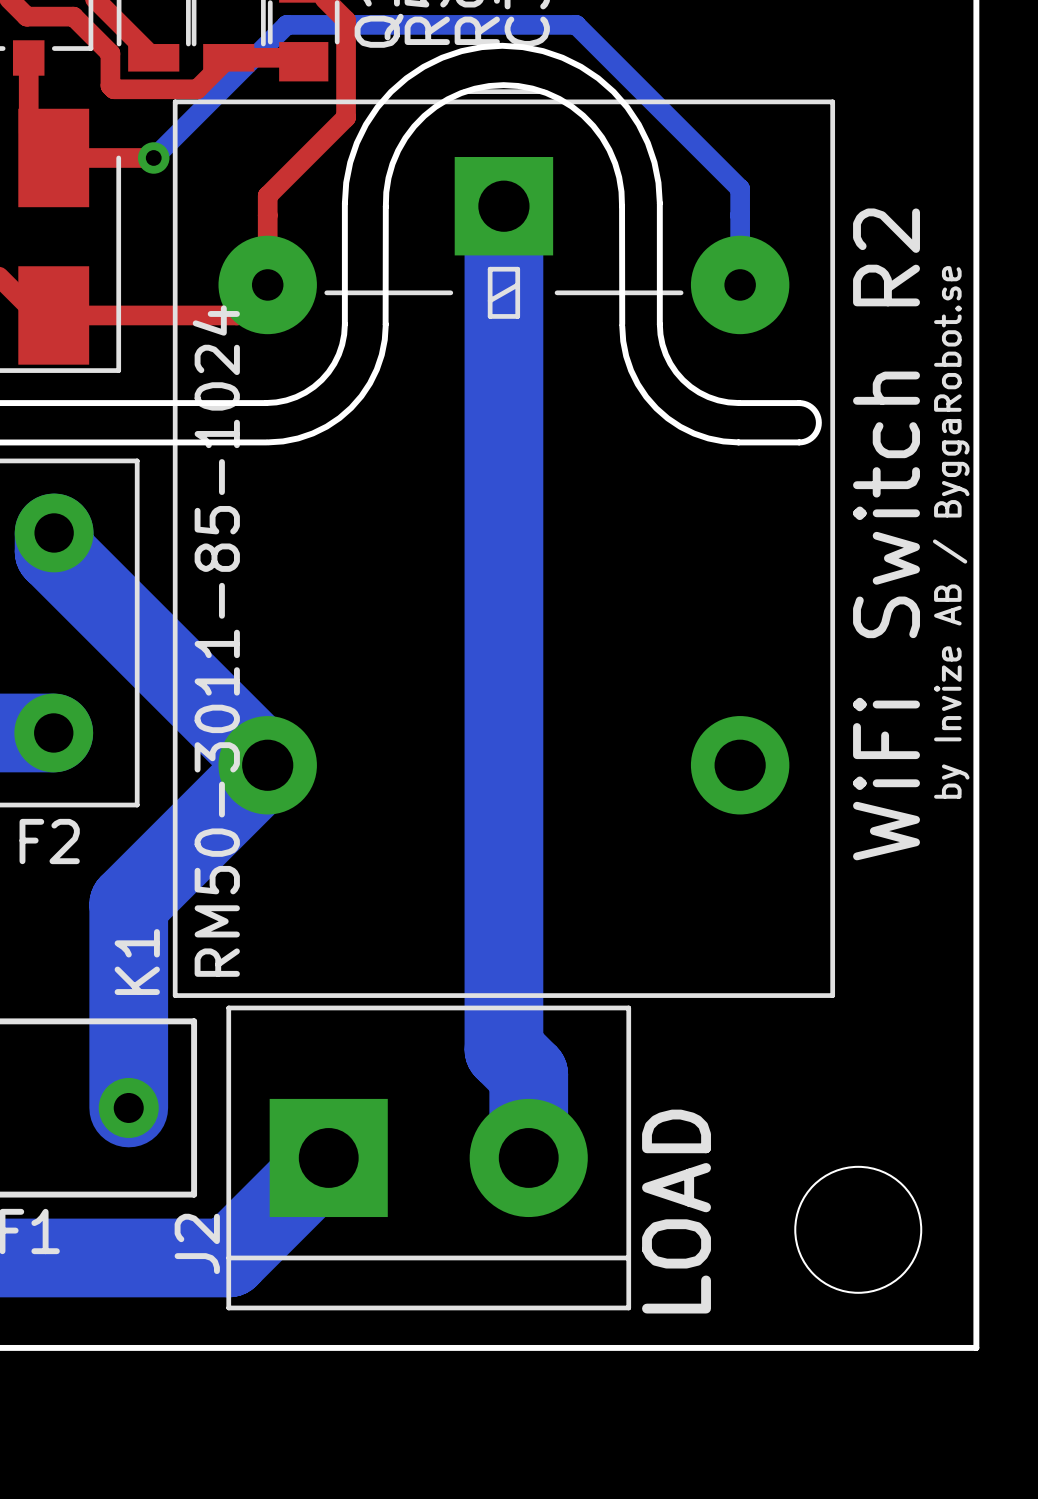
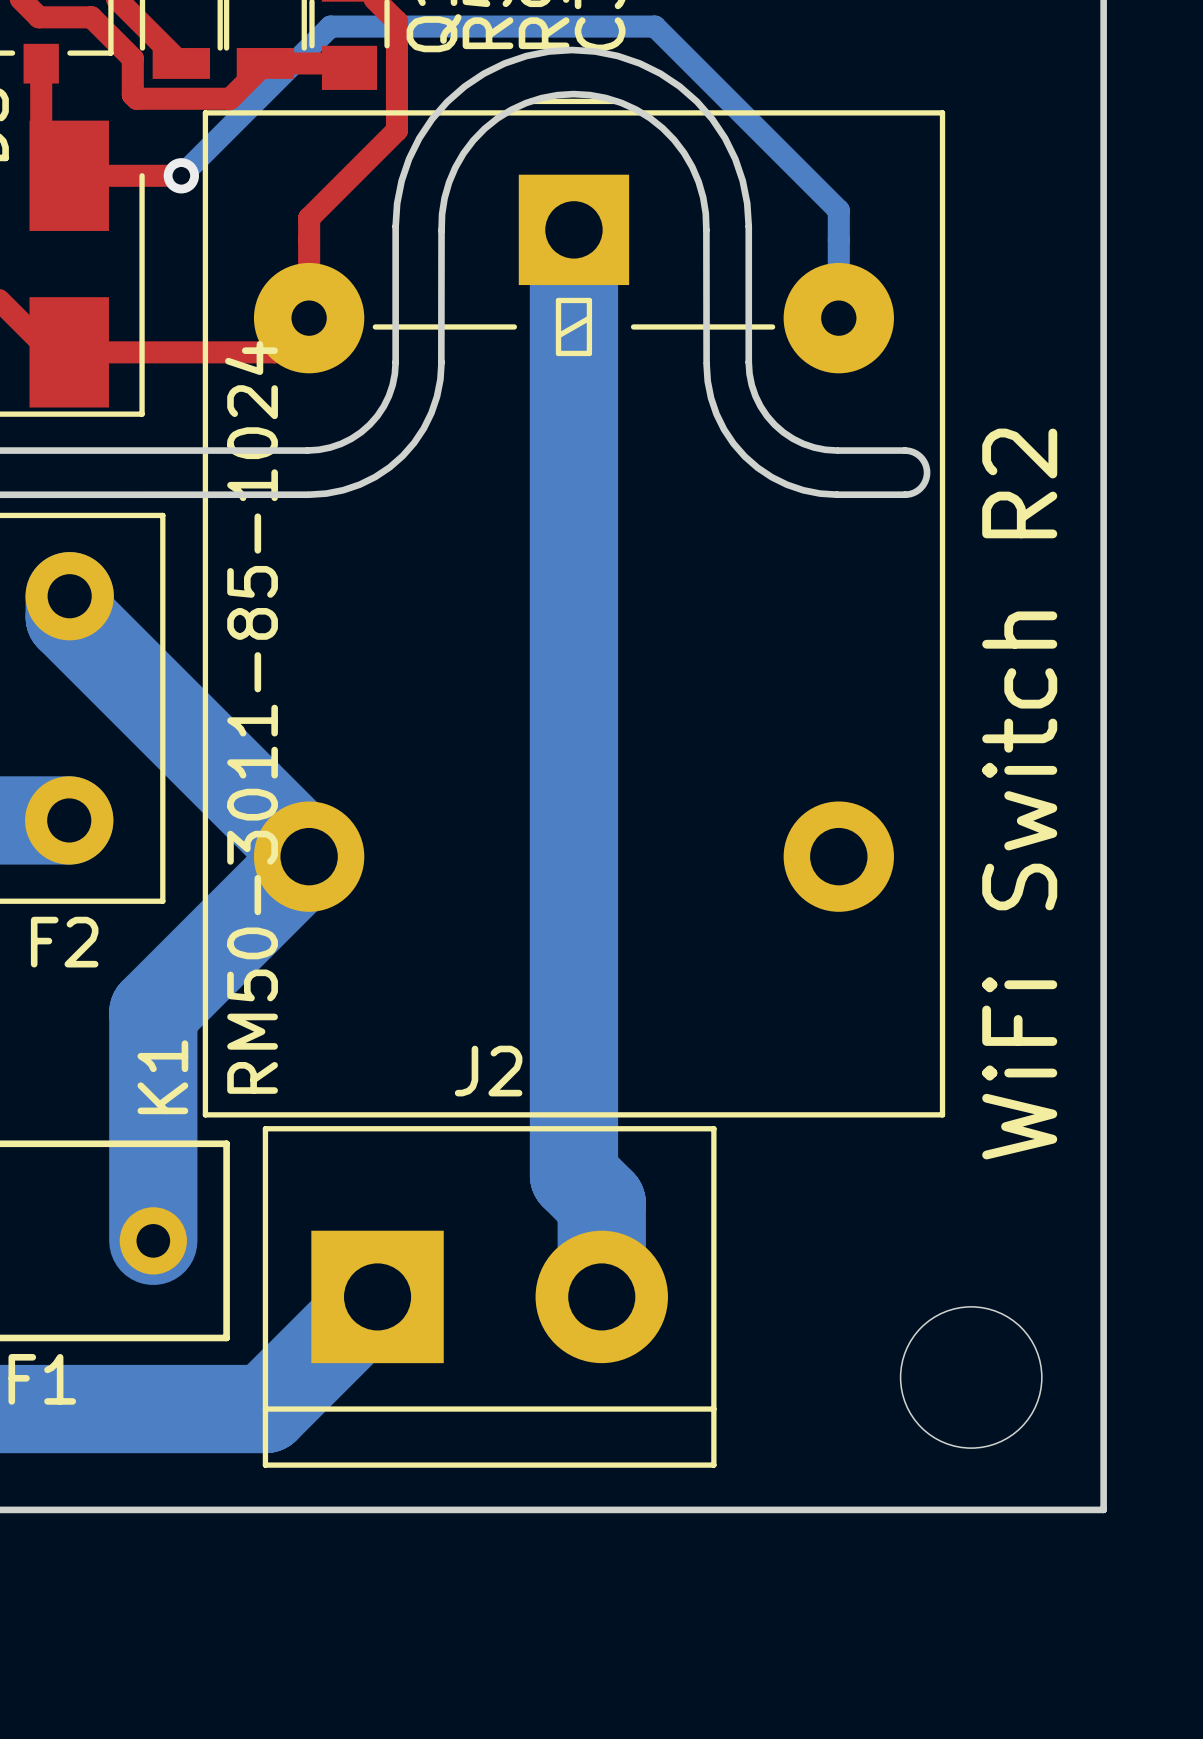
text: by Invize AB / ByggaRobot.se (951, 532) -> none
text position: WiFi Switch R2 (886, 534) -> WiFi Switch R2 (1019, 793)
text: LOAD (676, 1211) -> none
J2 name rotation: 0° (197, 1243) -> 90° clockwise (488, 1071)
J2 name position: J2 (197, 1243) -> J2 (488, 1071)

